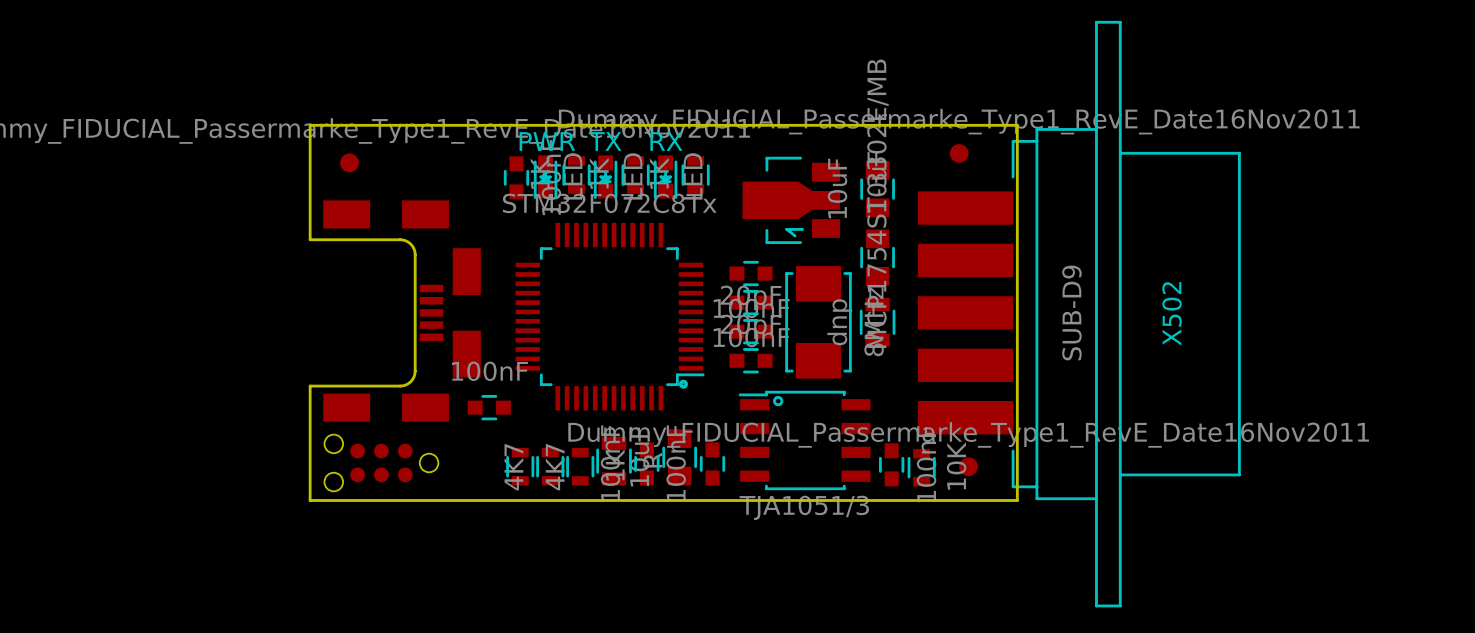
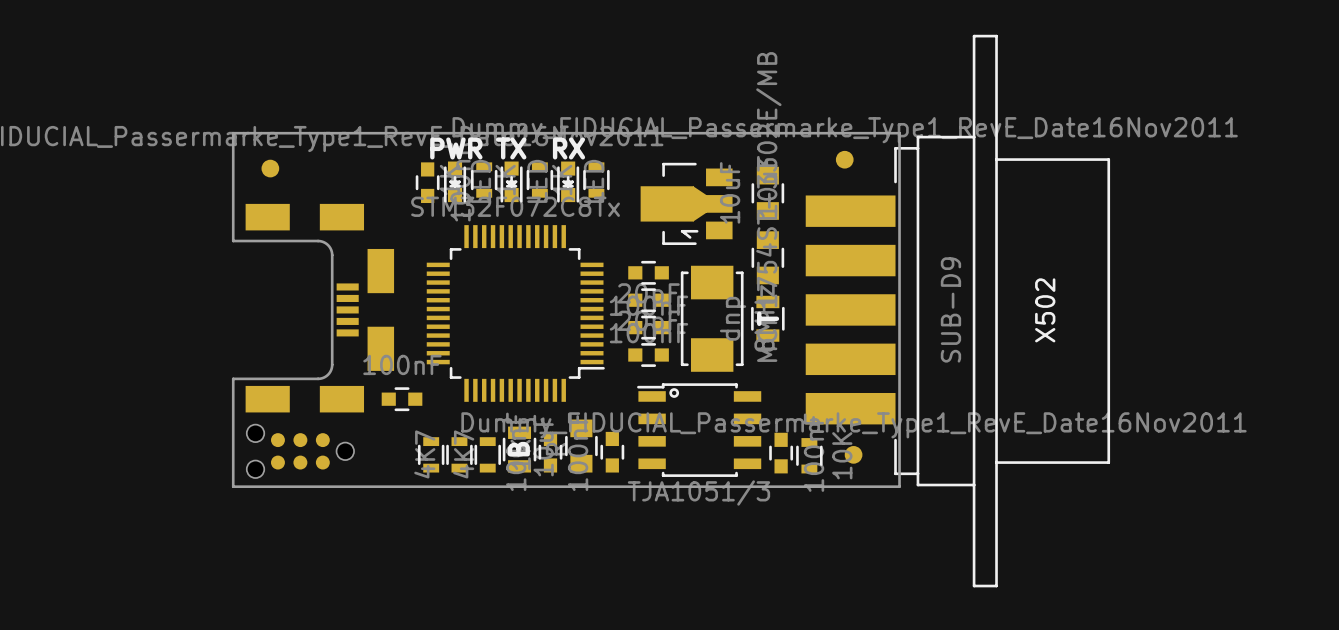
text: none -> T (768, 318)
drawing: [678, 379, 688, 389] -> none
text: none -> B (518, 449)

